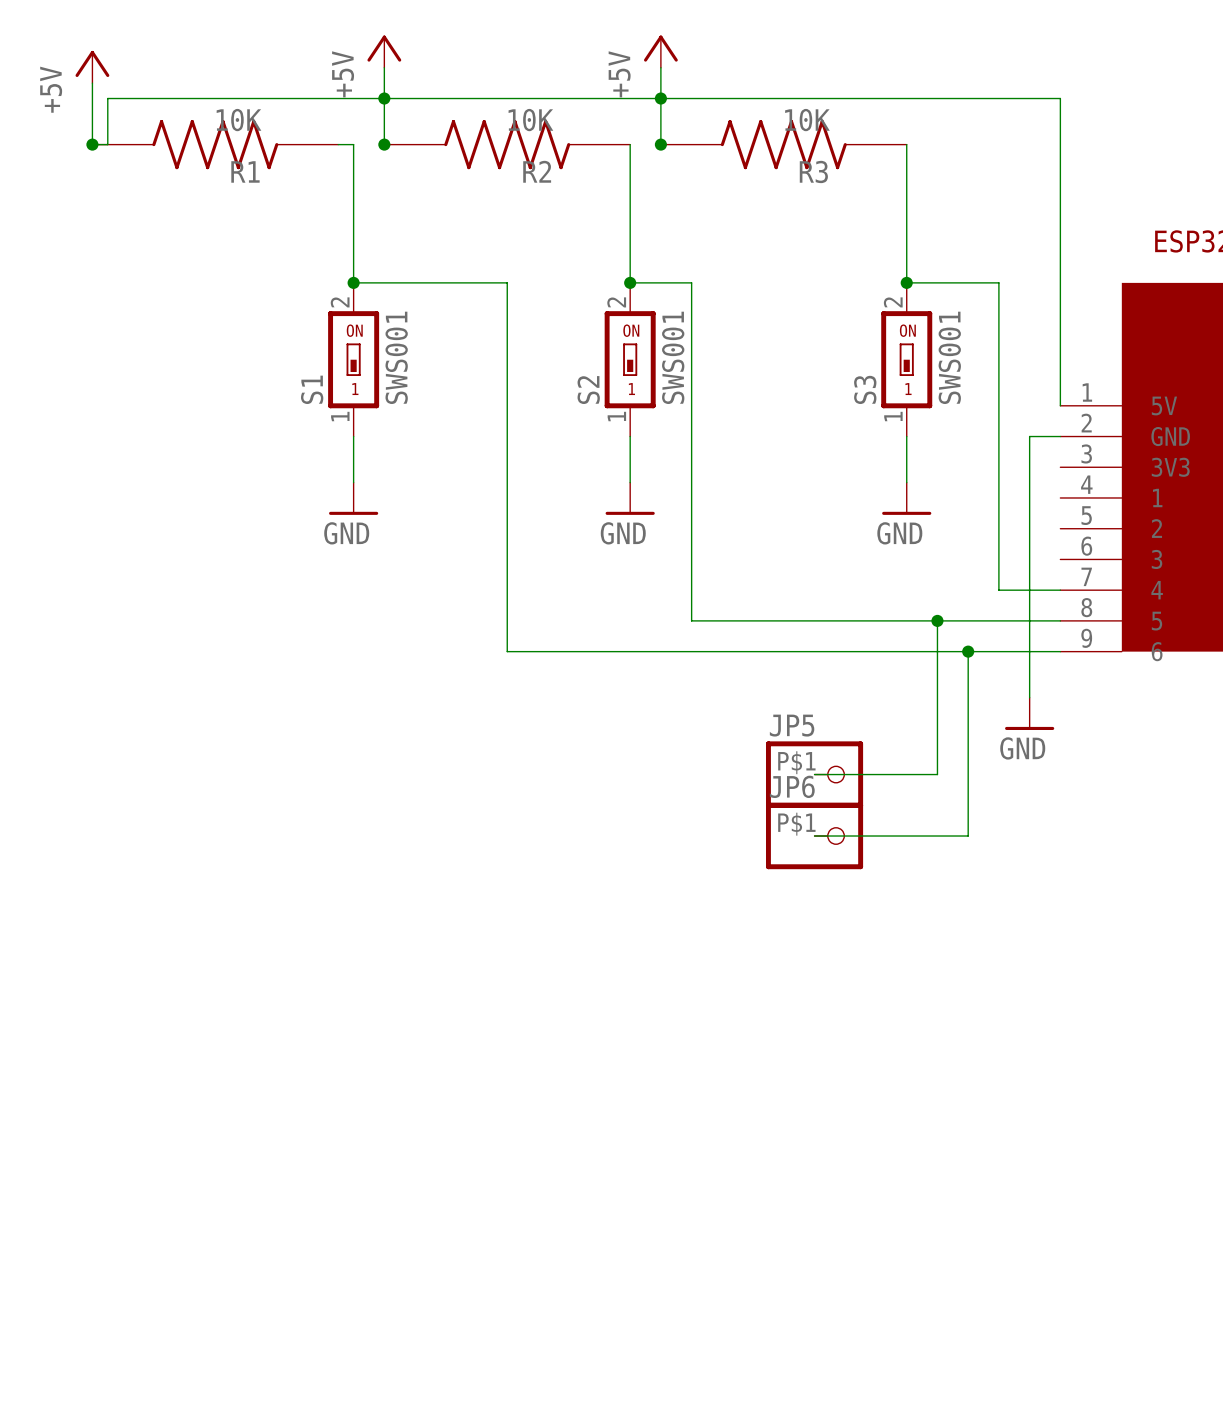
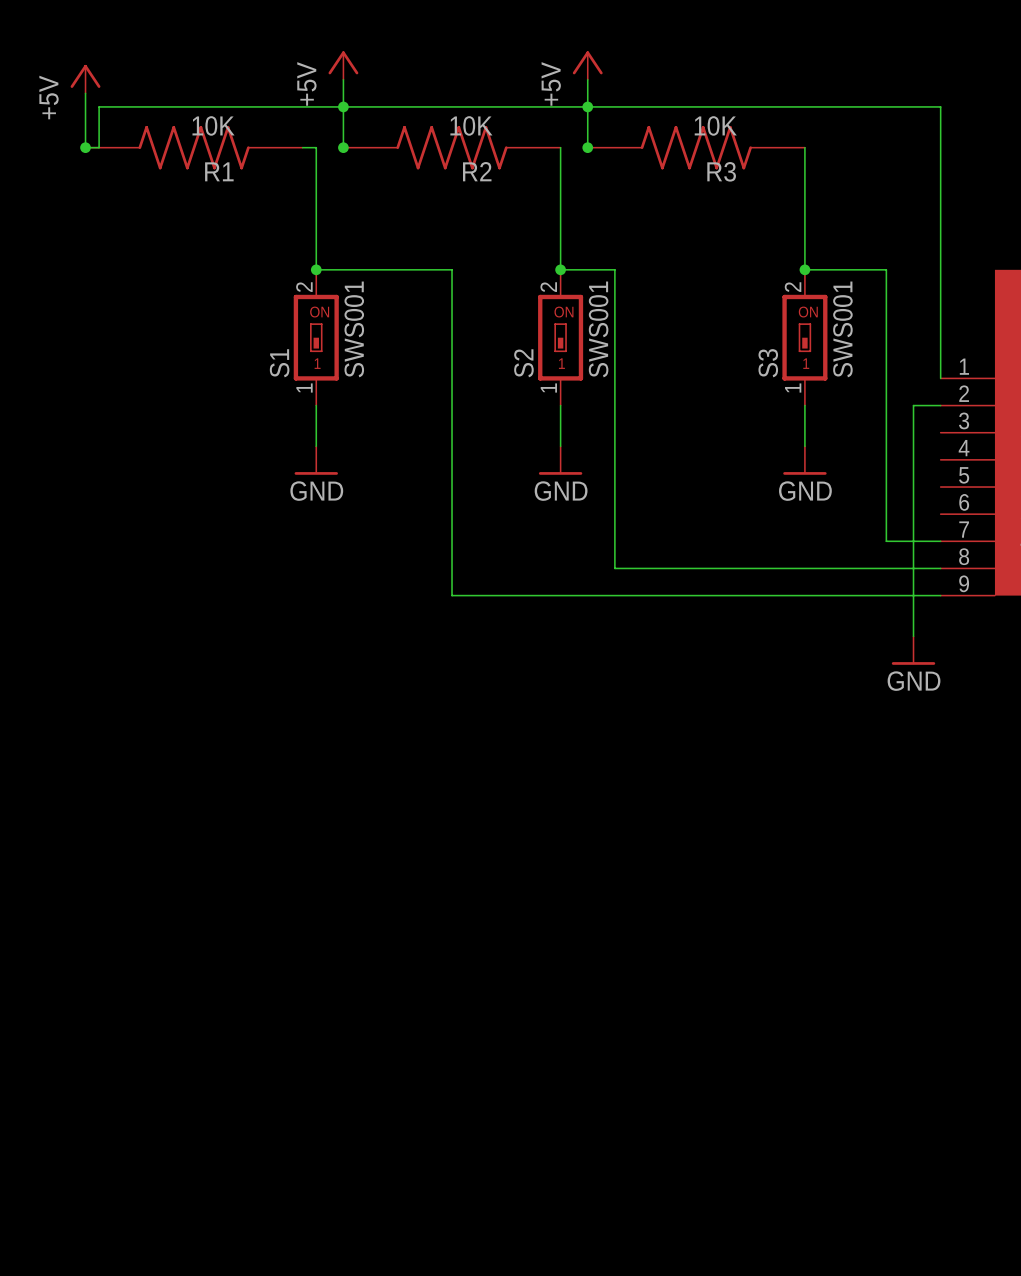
wire: (937, 620) (937, 774) (814, 774) -> none
junction: (937, 620) -> none
wire: (968, 651) (968, 836) (814, 836) -> none
junction: (968, 651) -> none
JP5: (814, 774) -> none
JP6: (814, 836) -> none

